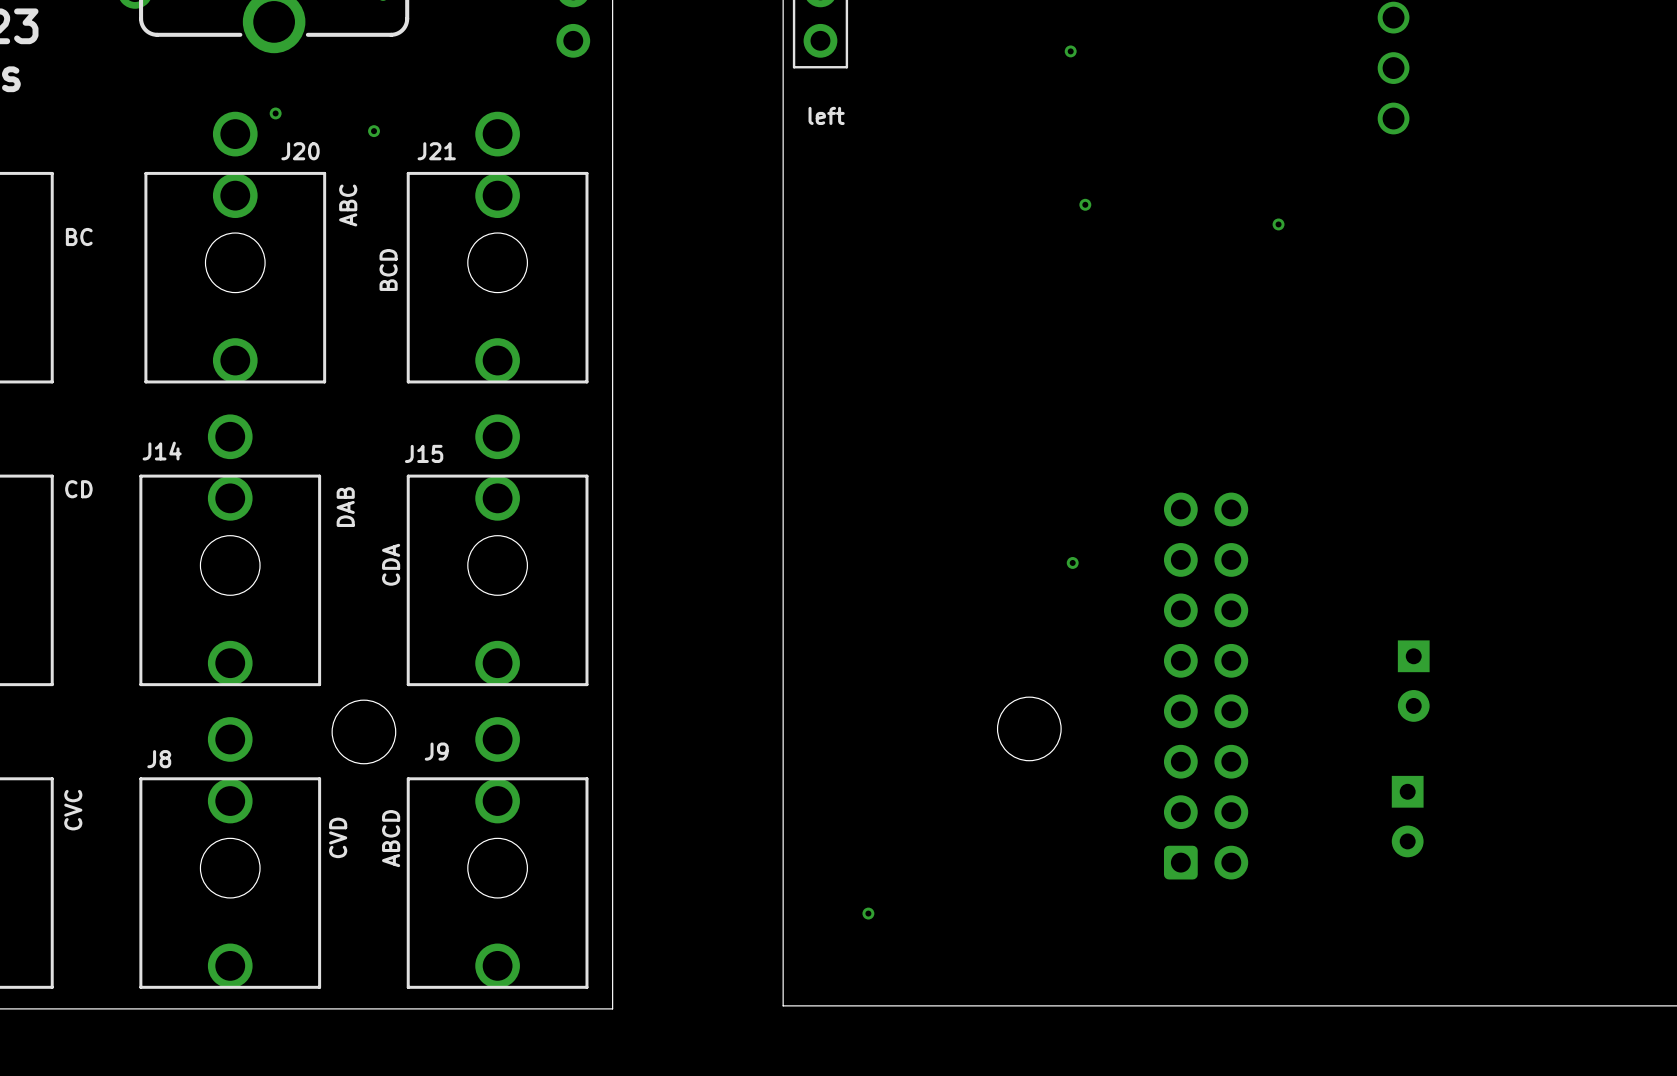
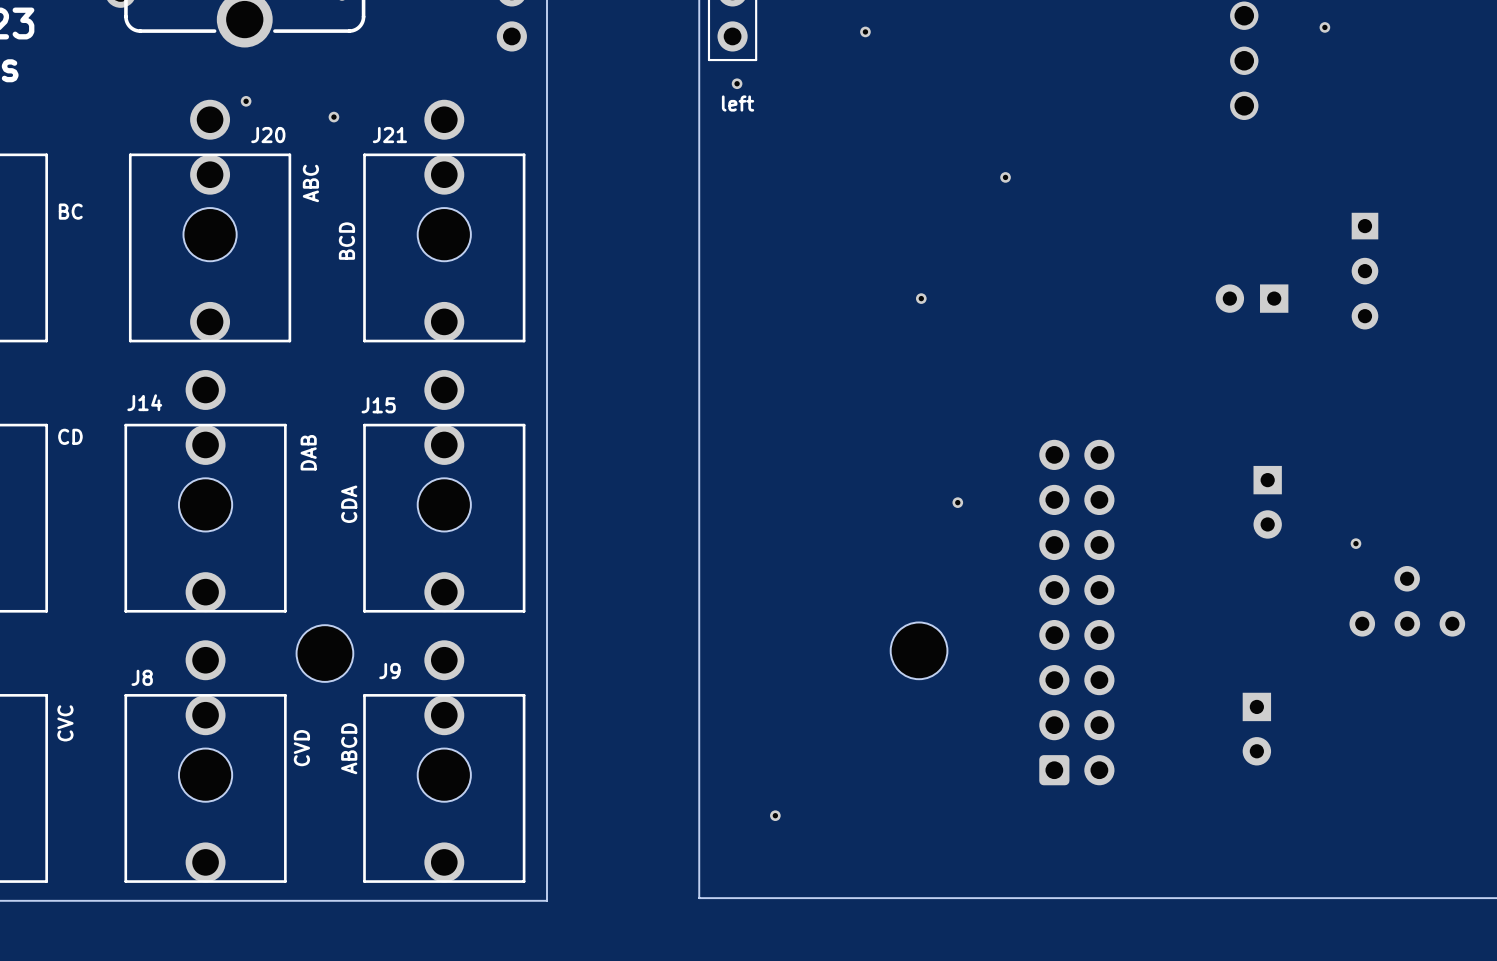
part: none -> (1324, 27)
part: none -> (865, 31)
part: (1070, 51) -> none
part: none -> (737, 83)
part position: (1085, 204) -> (1005, 177)
part: (1278, 224) -> none
part: none -> (1364, 271)
part: none -> (921, 298)
part: none -> (1252, 298)
part: none -> (1355, 543)
part: none -> (1407, 601)
part position: (1413, 681) -> (1267, 502)

